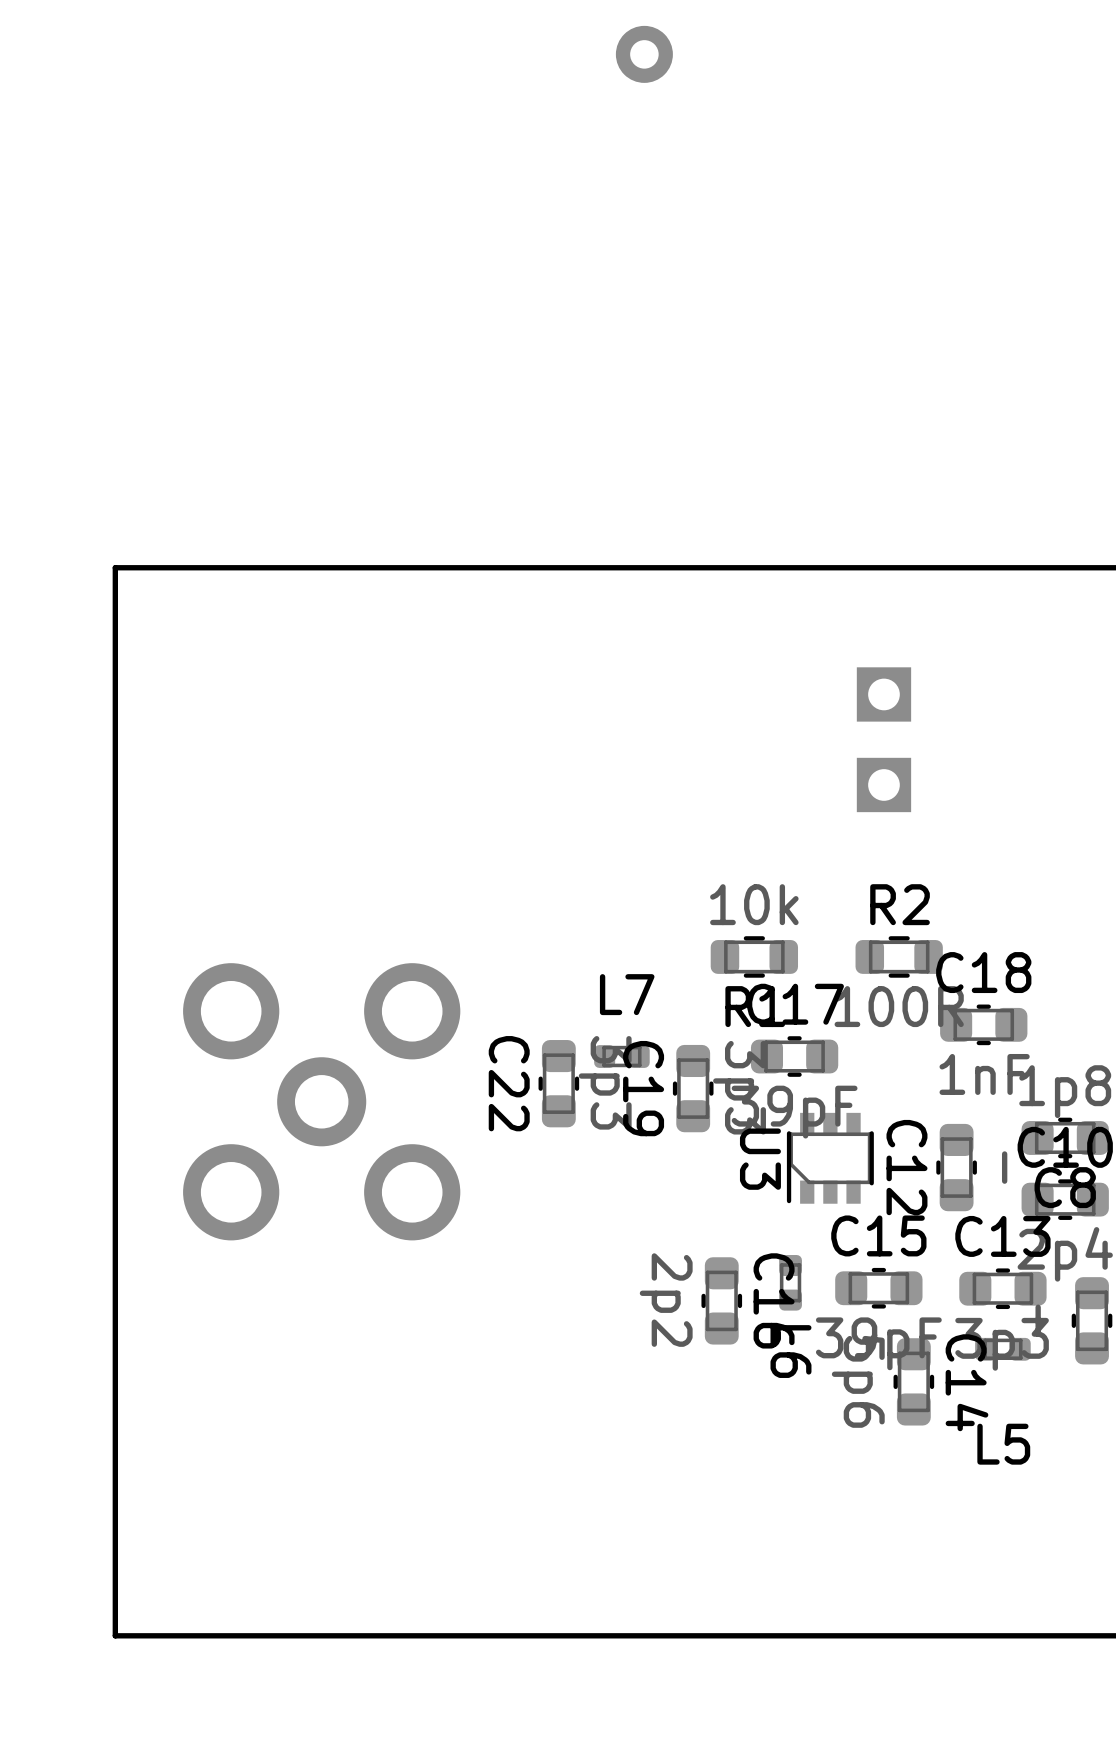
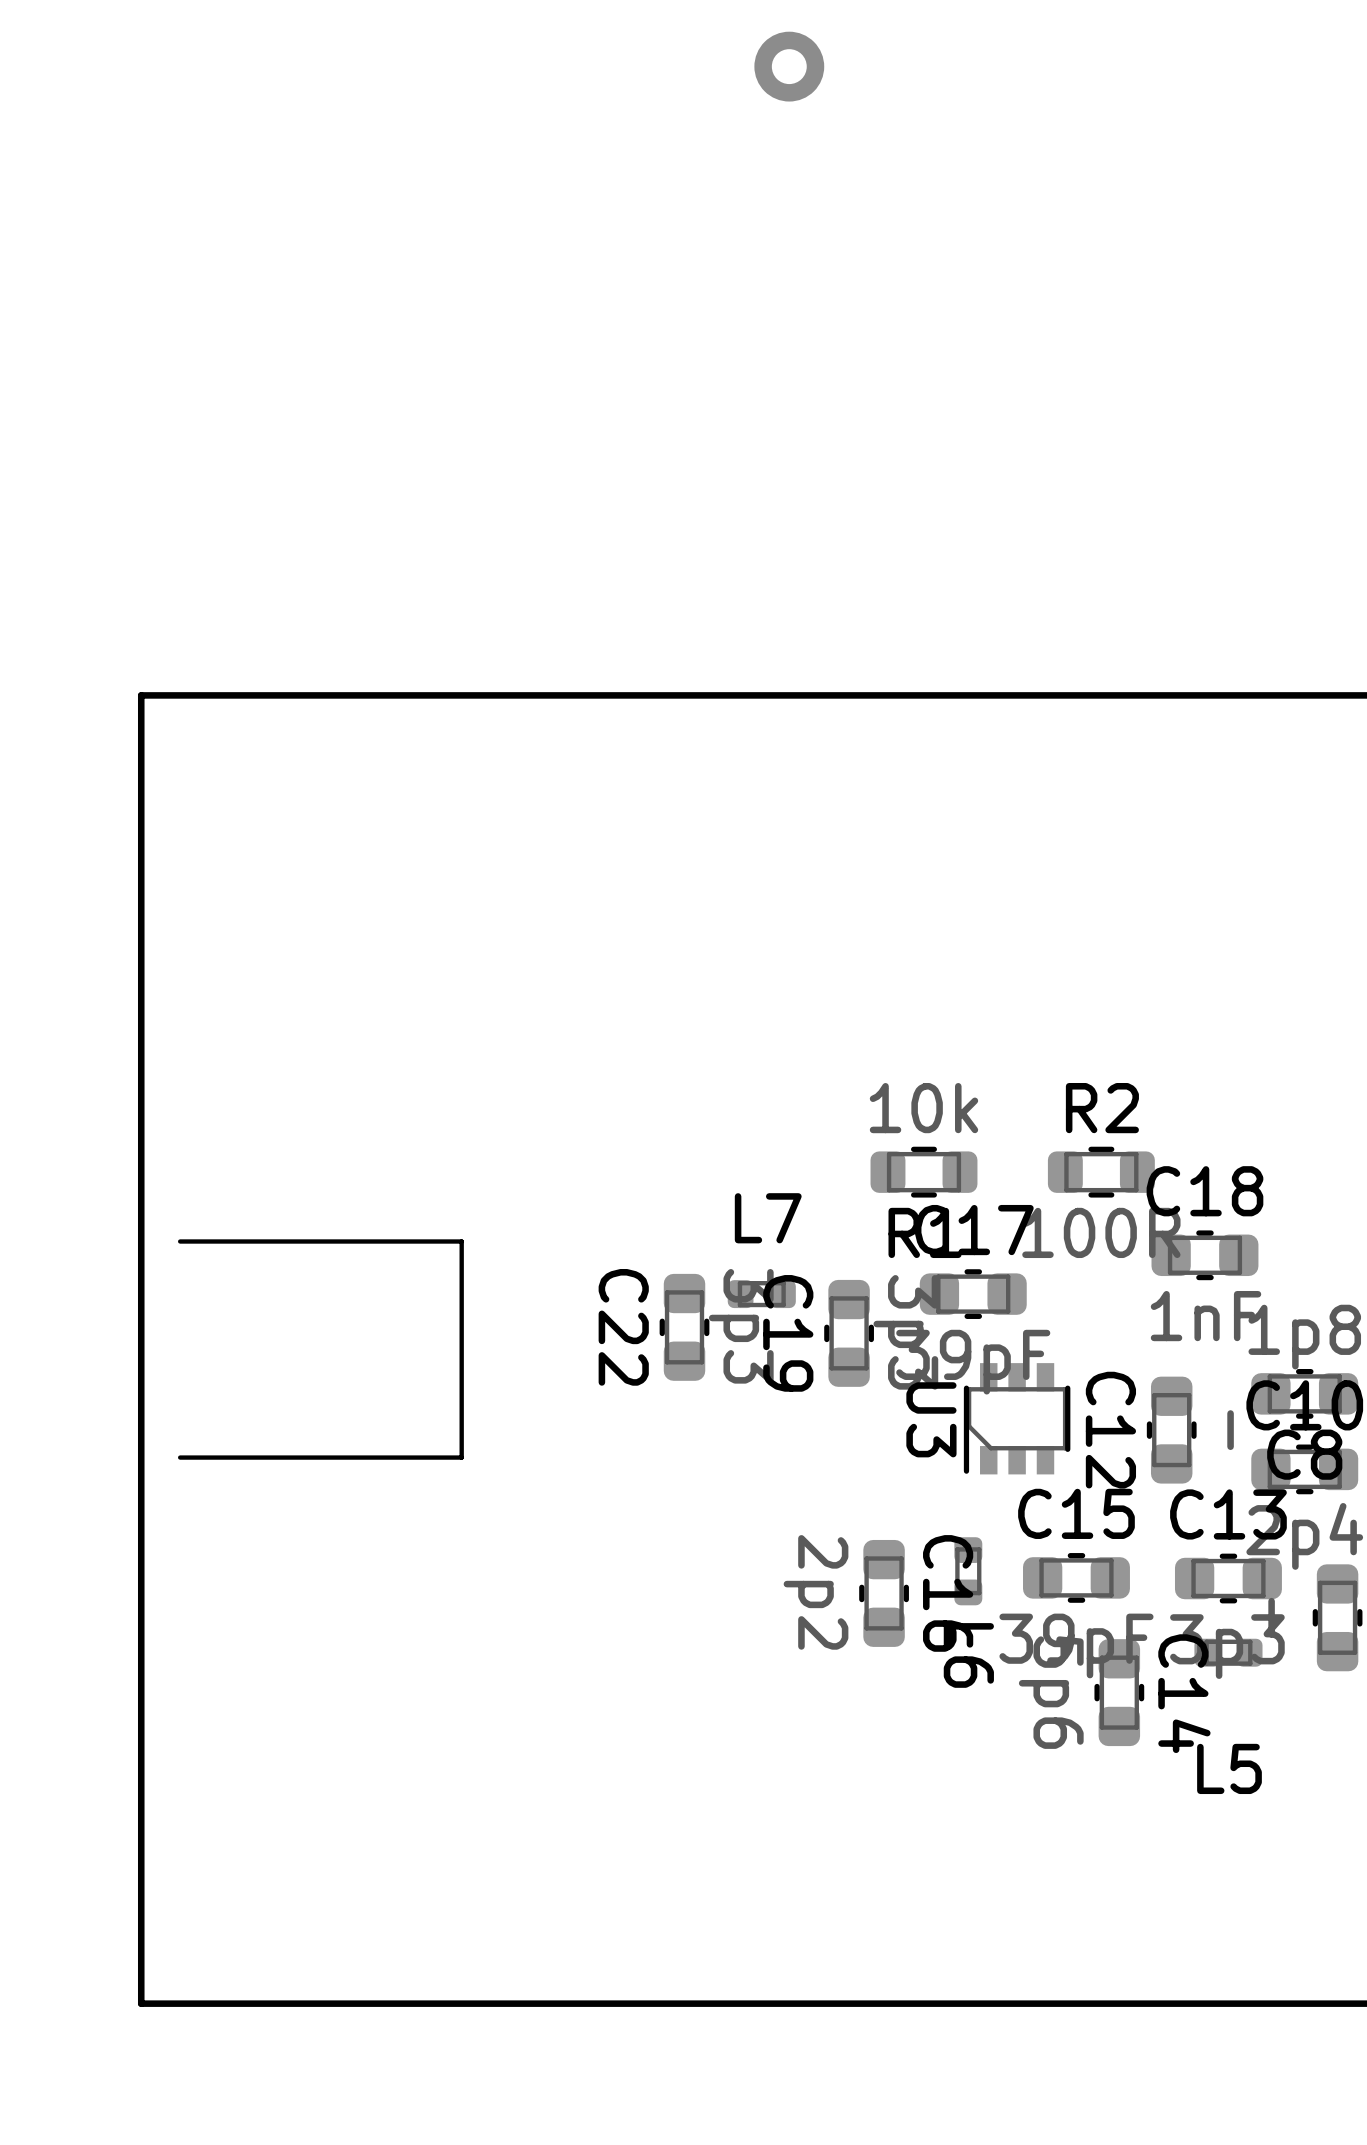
part: (883, 739) -> none
part: none -> (320, 1349)
part: (321, 1101) -> none

